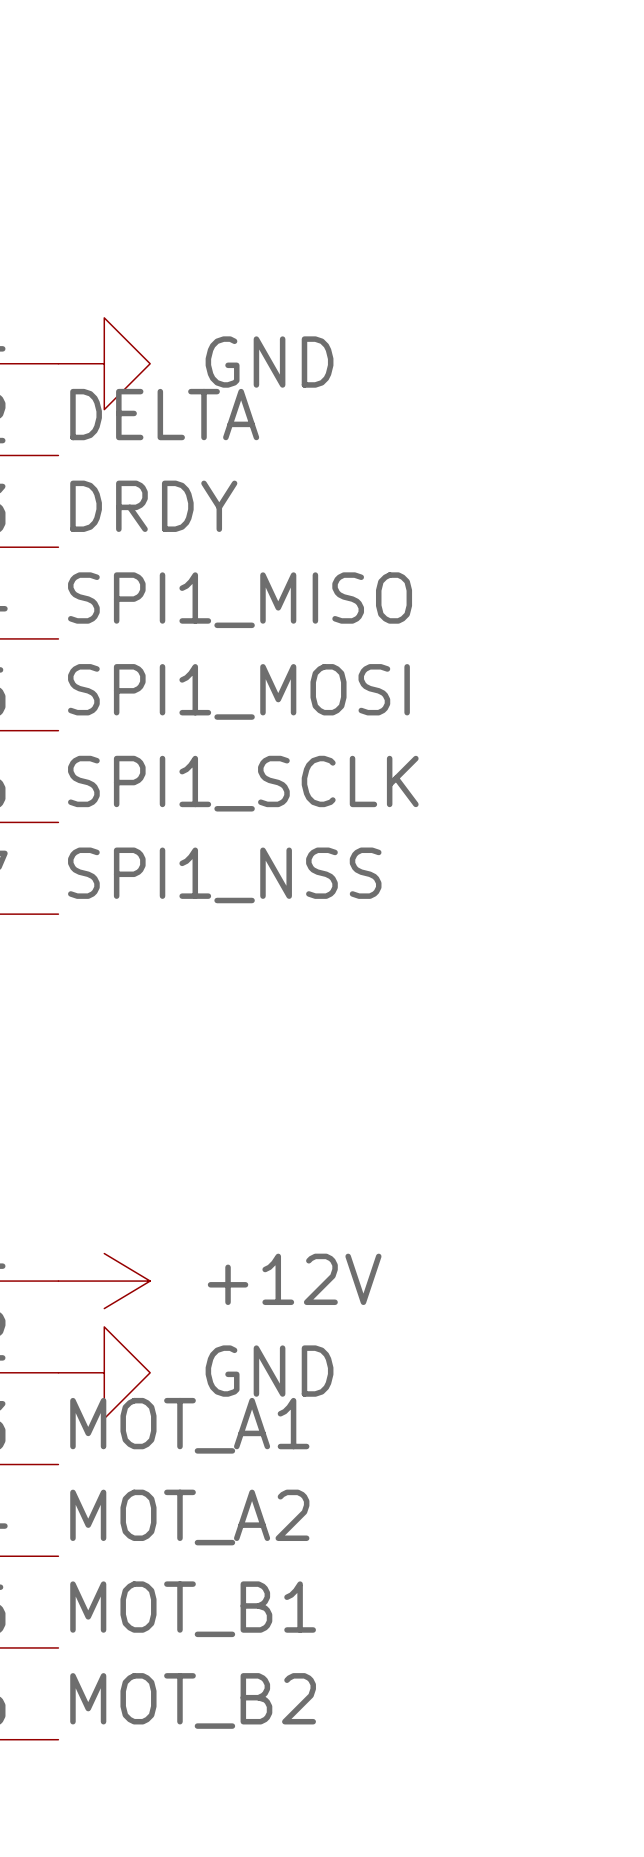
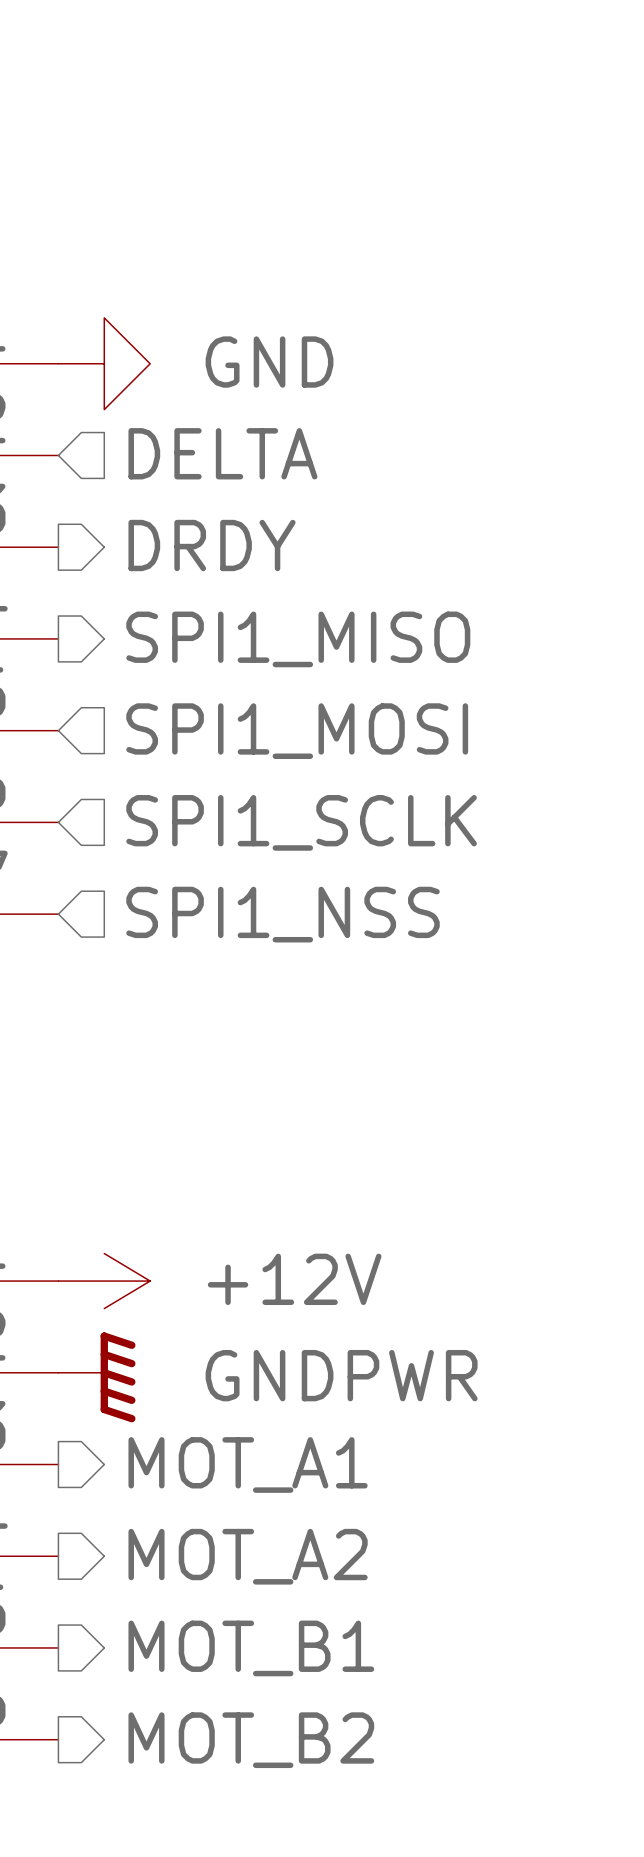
label: DELTA (164, 414) -> none
hierarchical label: none -> DELTA (222, 453)
label: DRDY (153, 506) -> none
hierarchical label: none -> DRDY (212, 545)
label: SPI1_MISO (240, 600) -> none
hierarchical label: none -> SPI1_MISO (298, 639)
label: SPI1_MOSI (238, 691) -> none
hierarchical label: none -> SPI1_MOSI (297, 731)
label: SPI1_SCLK (243, 783) -> none
hierarchical label: none -> SPI1_SCLK (301, 822)
label: SPI1_NSS (224, 875) -> none
hierarchical label: none -> SPI1_NSS (283, 914)
power symbol: GND (104, 1372) -> GNDPWR (96, 1377)
label: MOT_A1 (189, 1425) -> none
hierarchical label: none -> MOT_A1 (248, 1464)
label: MOT_A2 (189, 1517) -> none
hierarchical label: none -> MOT_A2 (248, 1556)
label: MOT_B1 (193, 1609) -> none
hierarchical label: none -> MOT_B1 (251, 1648)
label: MOT_B2 (193, 1700) -> none
hierarchical label: none -> MOT_B2 (251, 1740)

